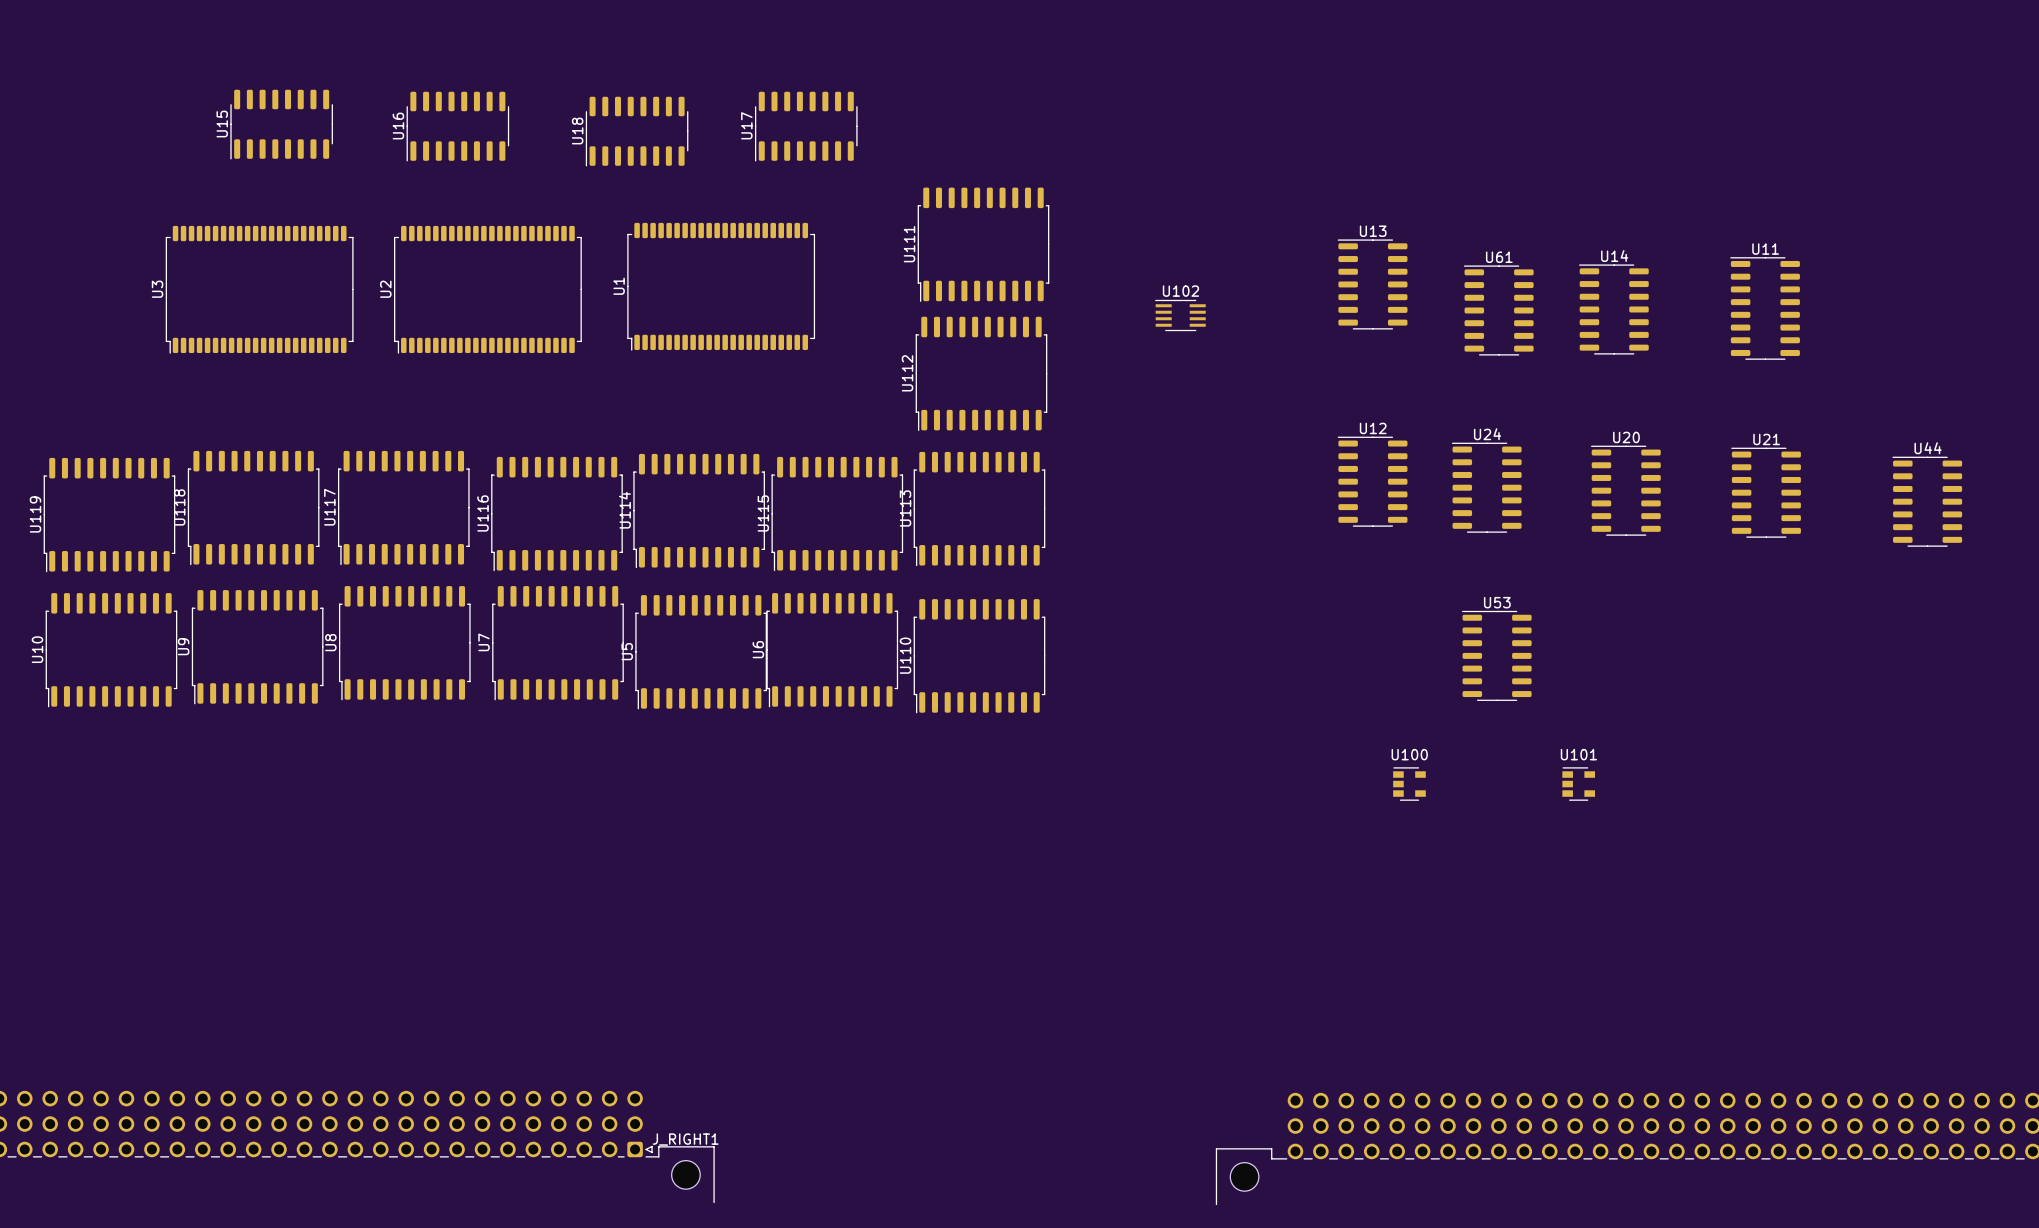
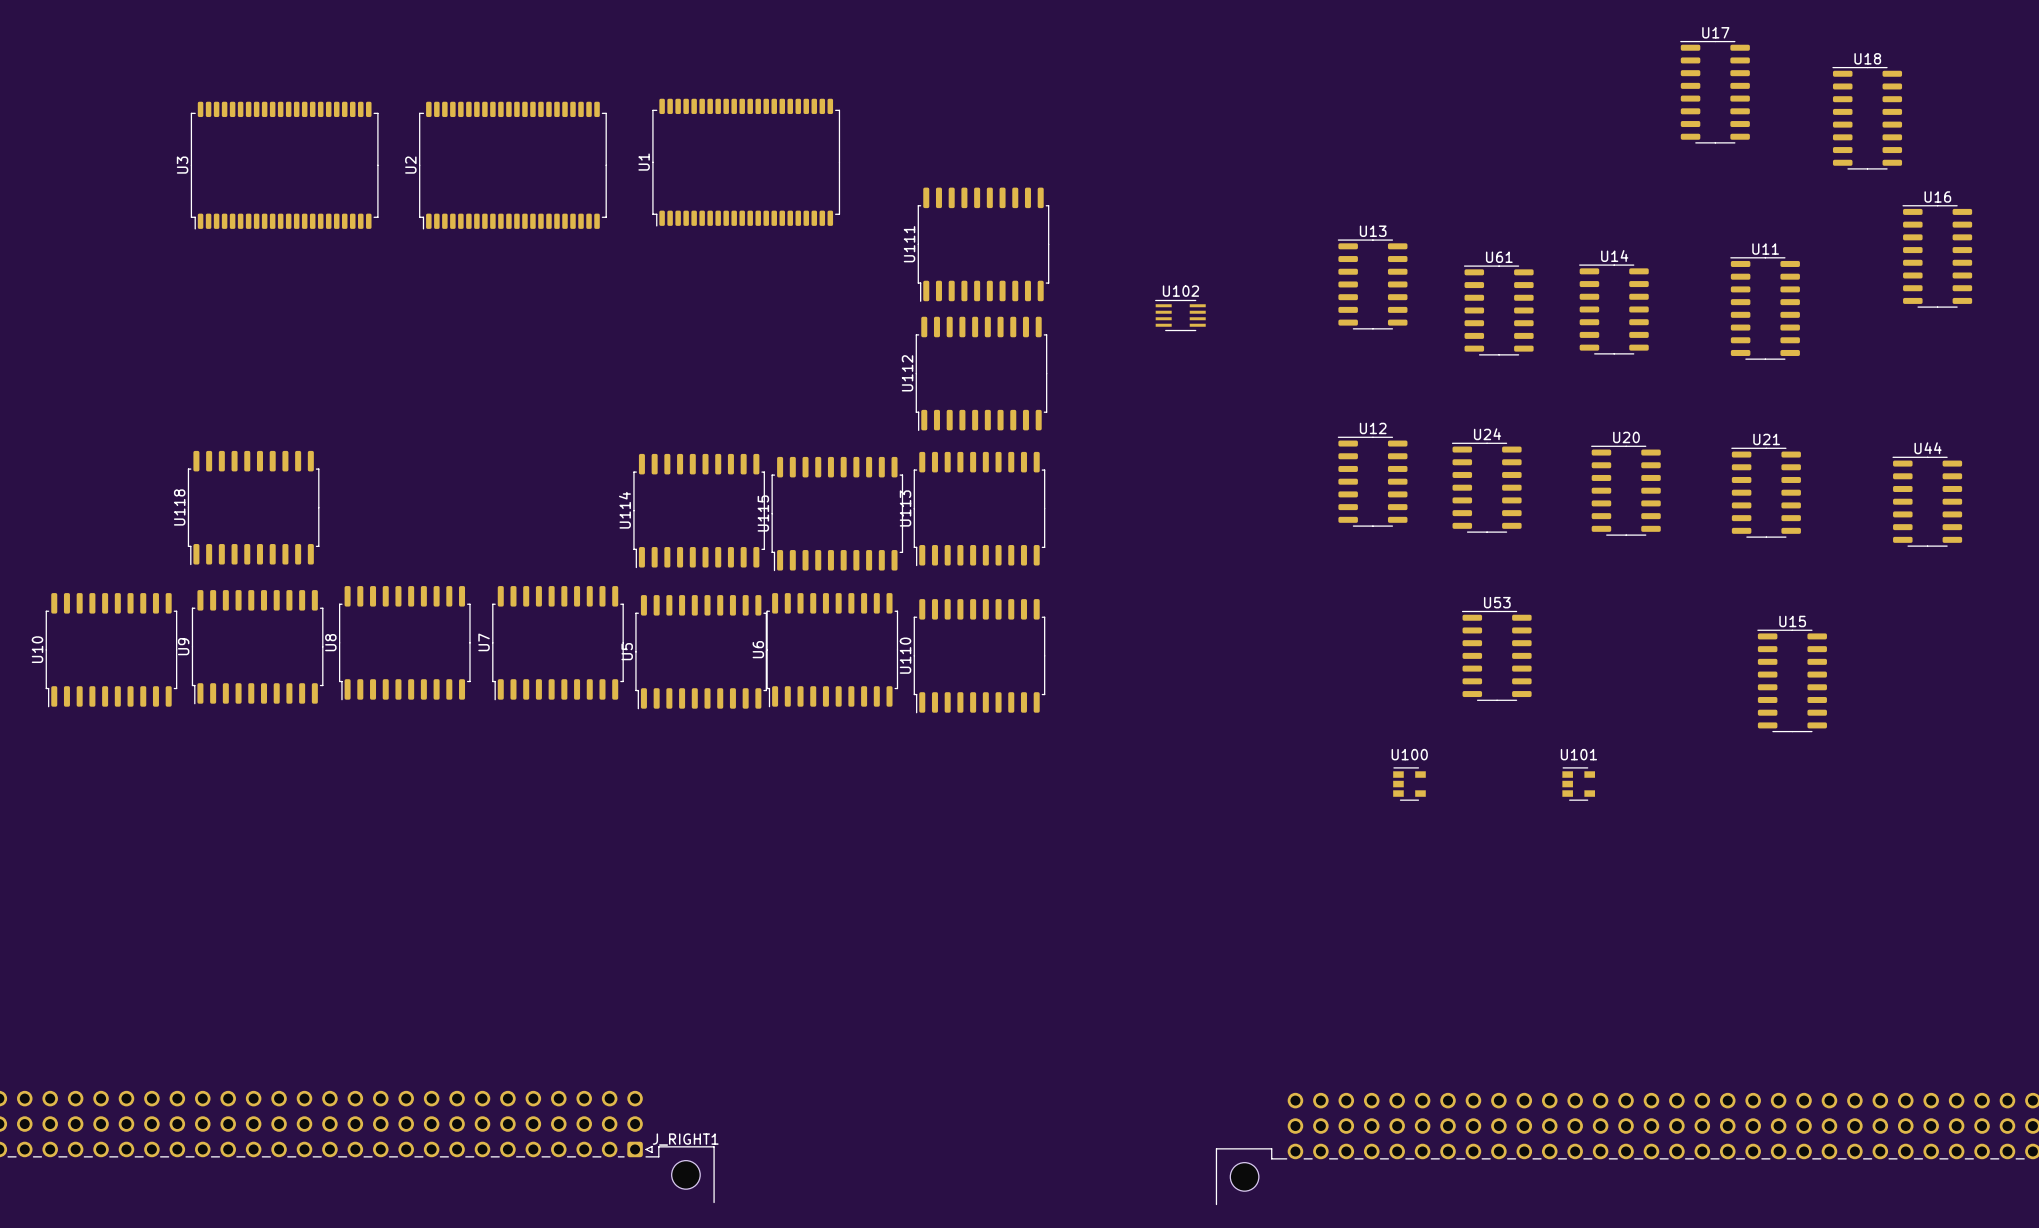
U15 rotation: 0° (281, 124) -> 90° clockwise (1792, 680)
U15 position: (281, 124) -> (1792, 680)
U16 rotation: 0° (457, 126) -> 90° clockwise (1937, 256)
U16 position: (457, 126) -> (1937, 256)
U17 rotation: 0° (806, 126) -> 90° clockwise (1715, 92)
U17 position: (806, 126) -> (1715, 92)
U18 rotation: 0° (637, 131) -> 90° clockwise (1867, 118)
U18 position: (637, 131) -> (1867, 118)
U1 position: (721, 286) -> (746, 162)
U3 position: (259, 289) -> (284, 165)
U2 position: (487, 289) -> (512, 165)
U117: (403, 508) -> none
U116: (556, 514) -> none
U119: (109, 515) -> none

